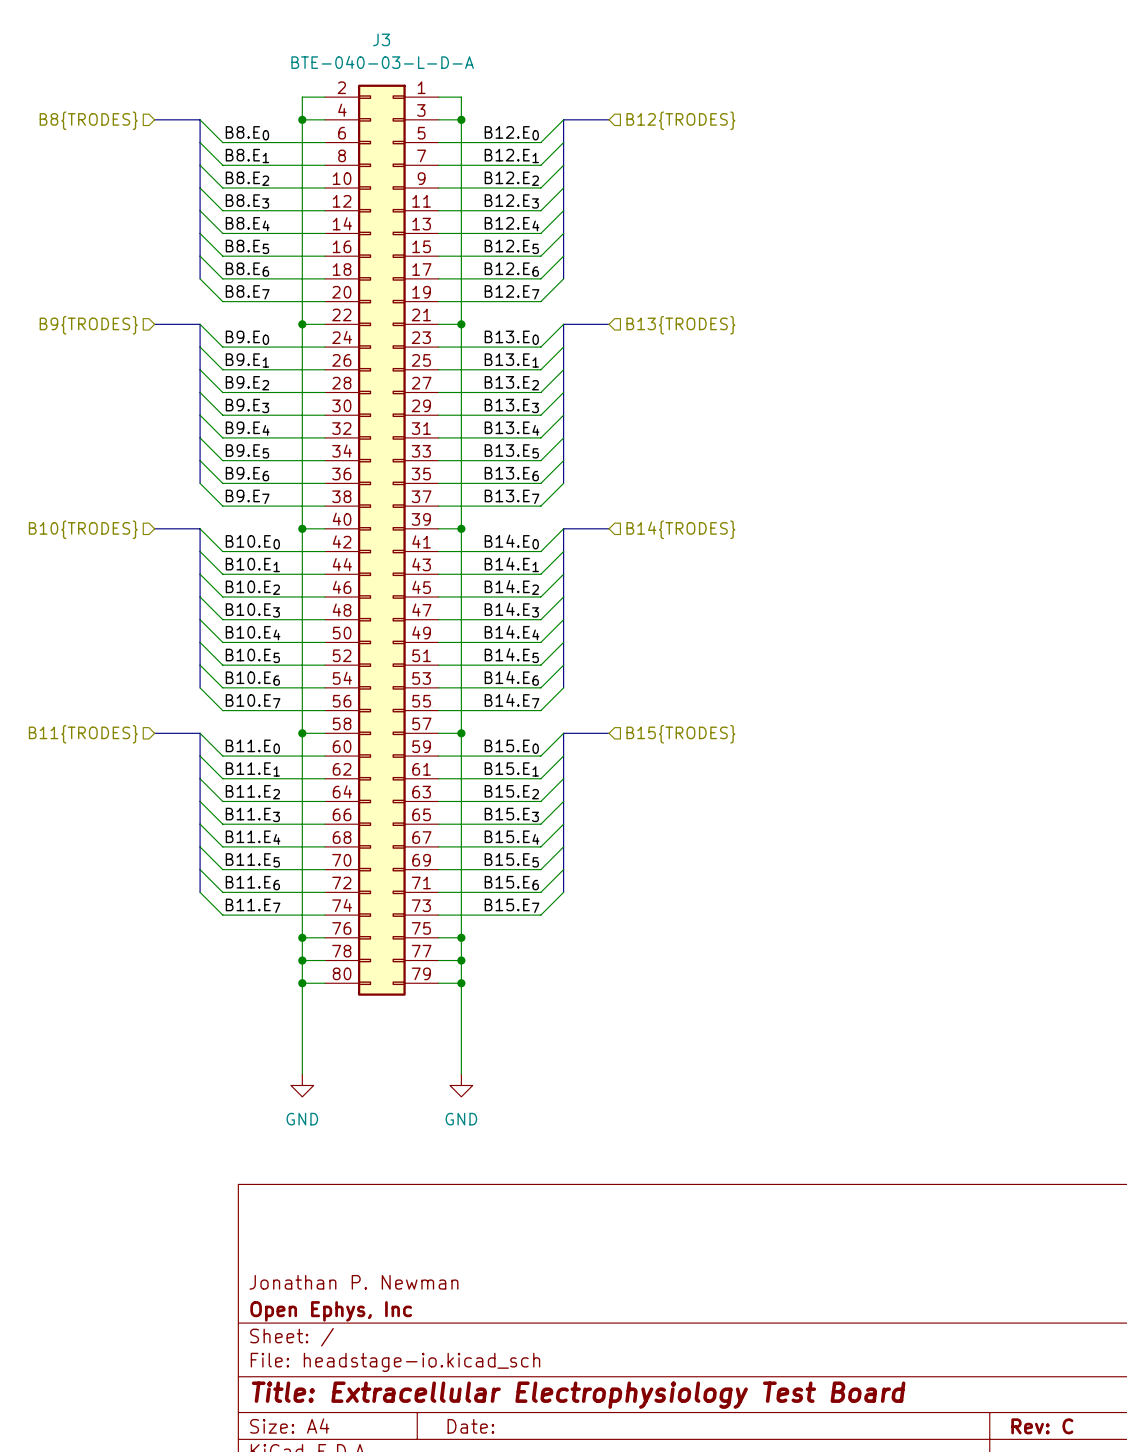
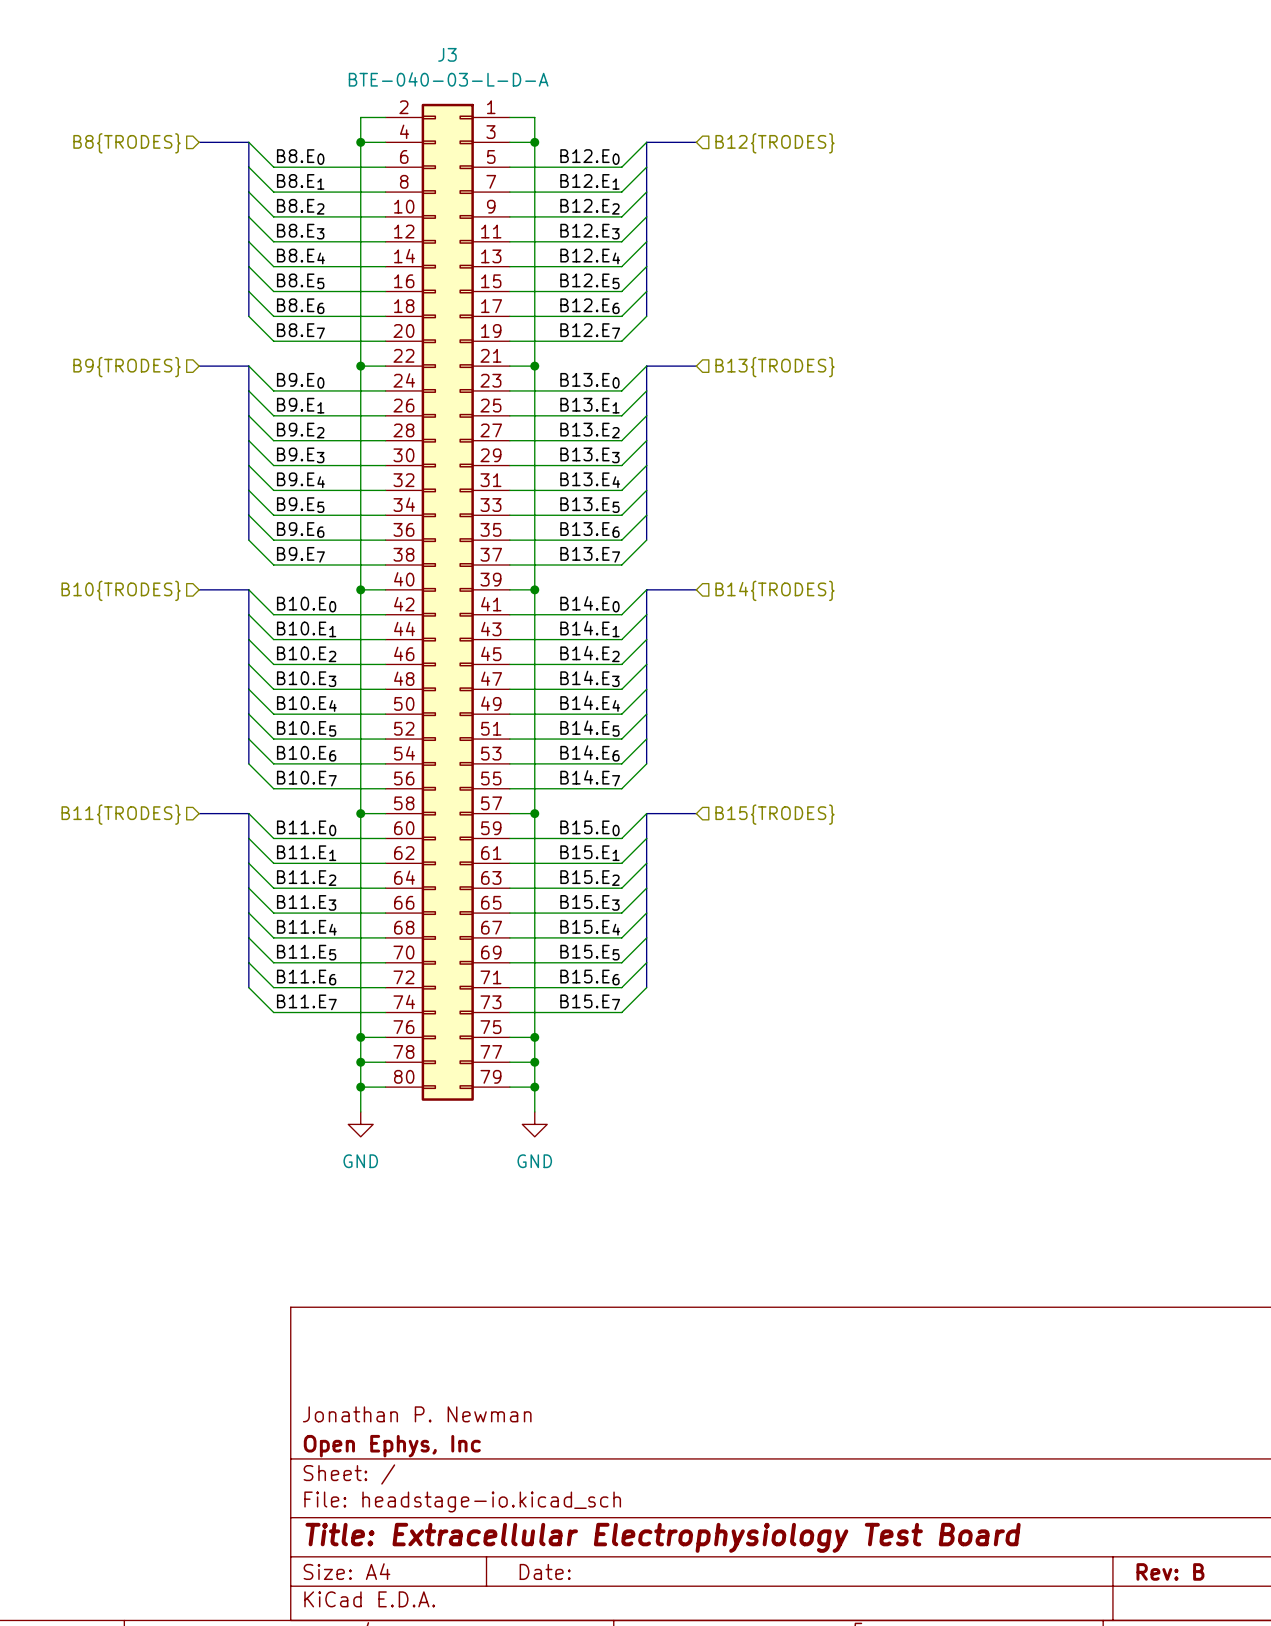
wire: (302, 1005) (302, 1074) -> none
wire: (461, 1005) (461, 1074) -> none
power symbol position: GND (302, 1085) -> GND (360, 1124)
power symbol position: GND (461, 1085) -> GND (534, 1124)
title block: Rev: C (1042, 1426) -> Rev: B (1170, 1571)

